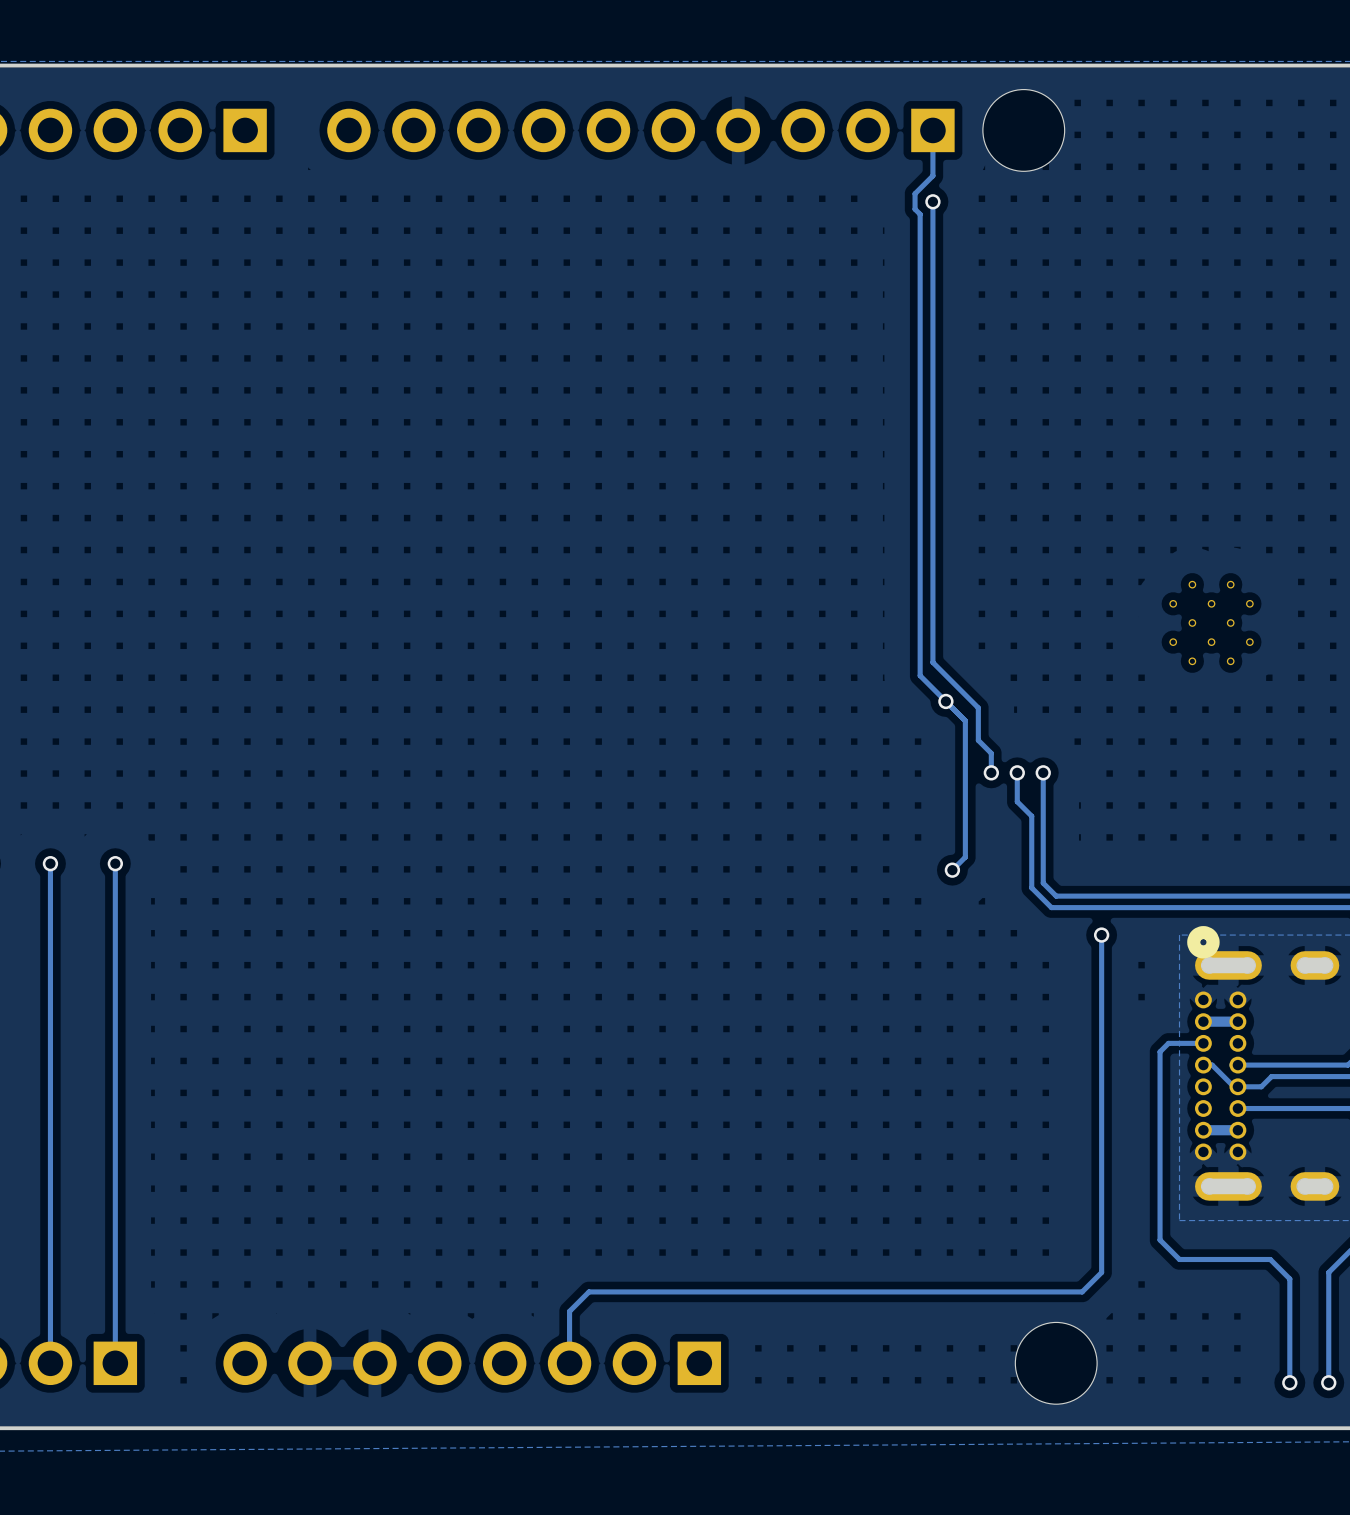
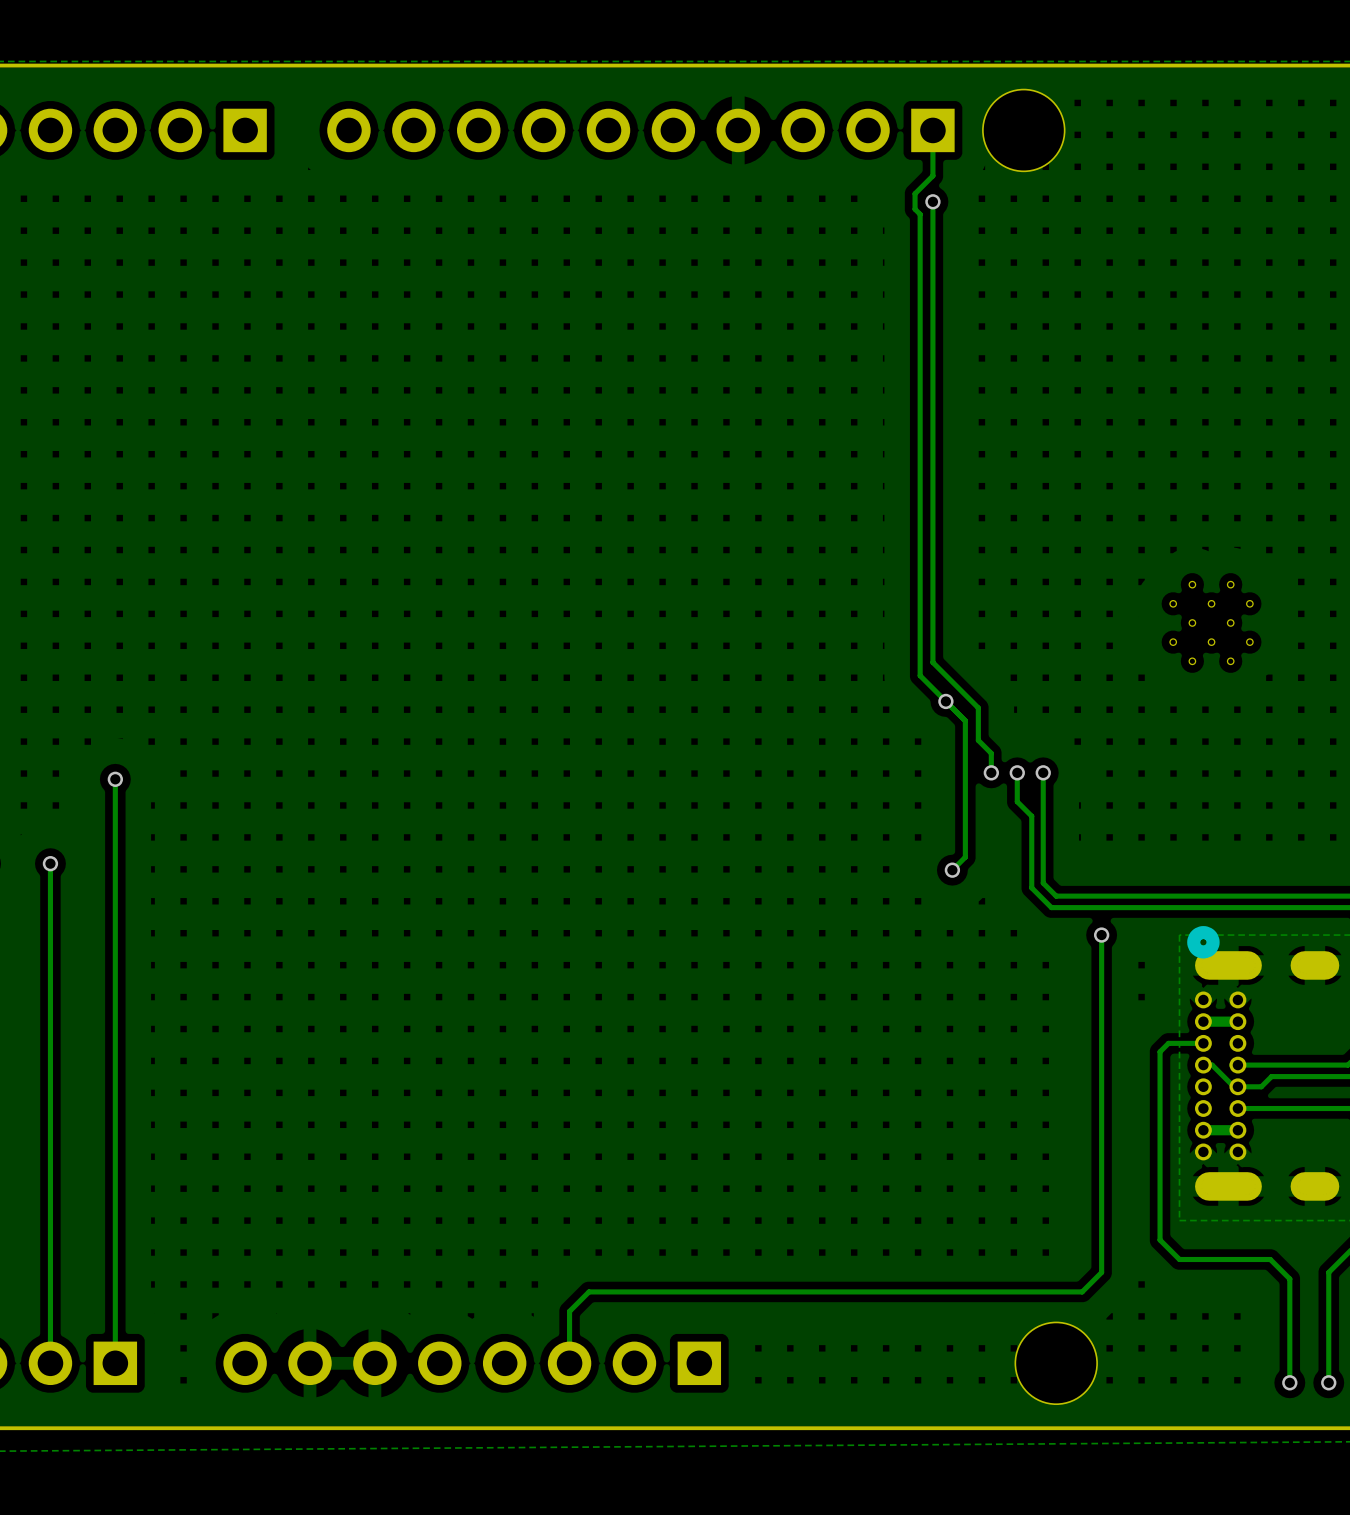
track: none -> (115, 779) (115, 863)
via position: (115, 863) -> (115, 779)

